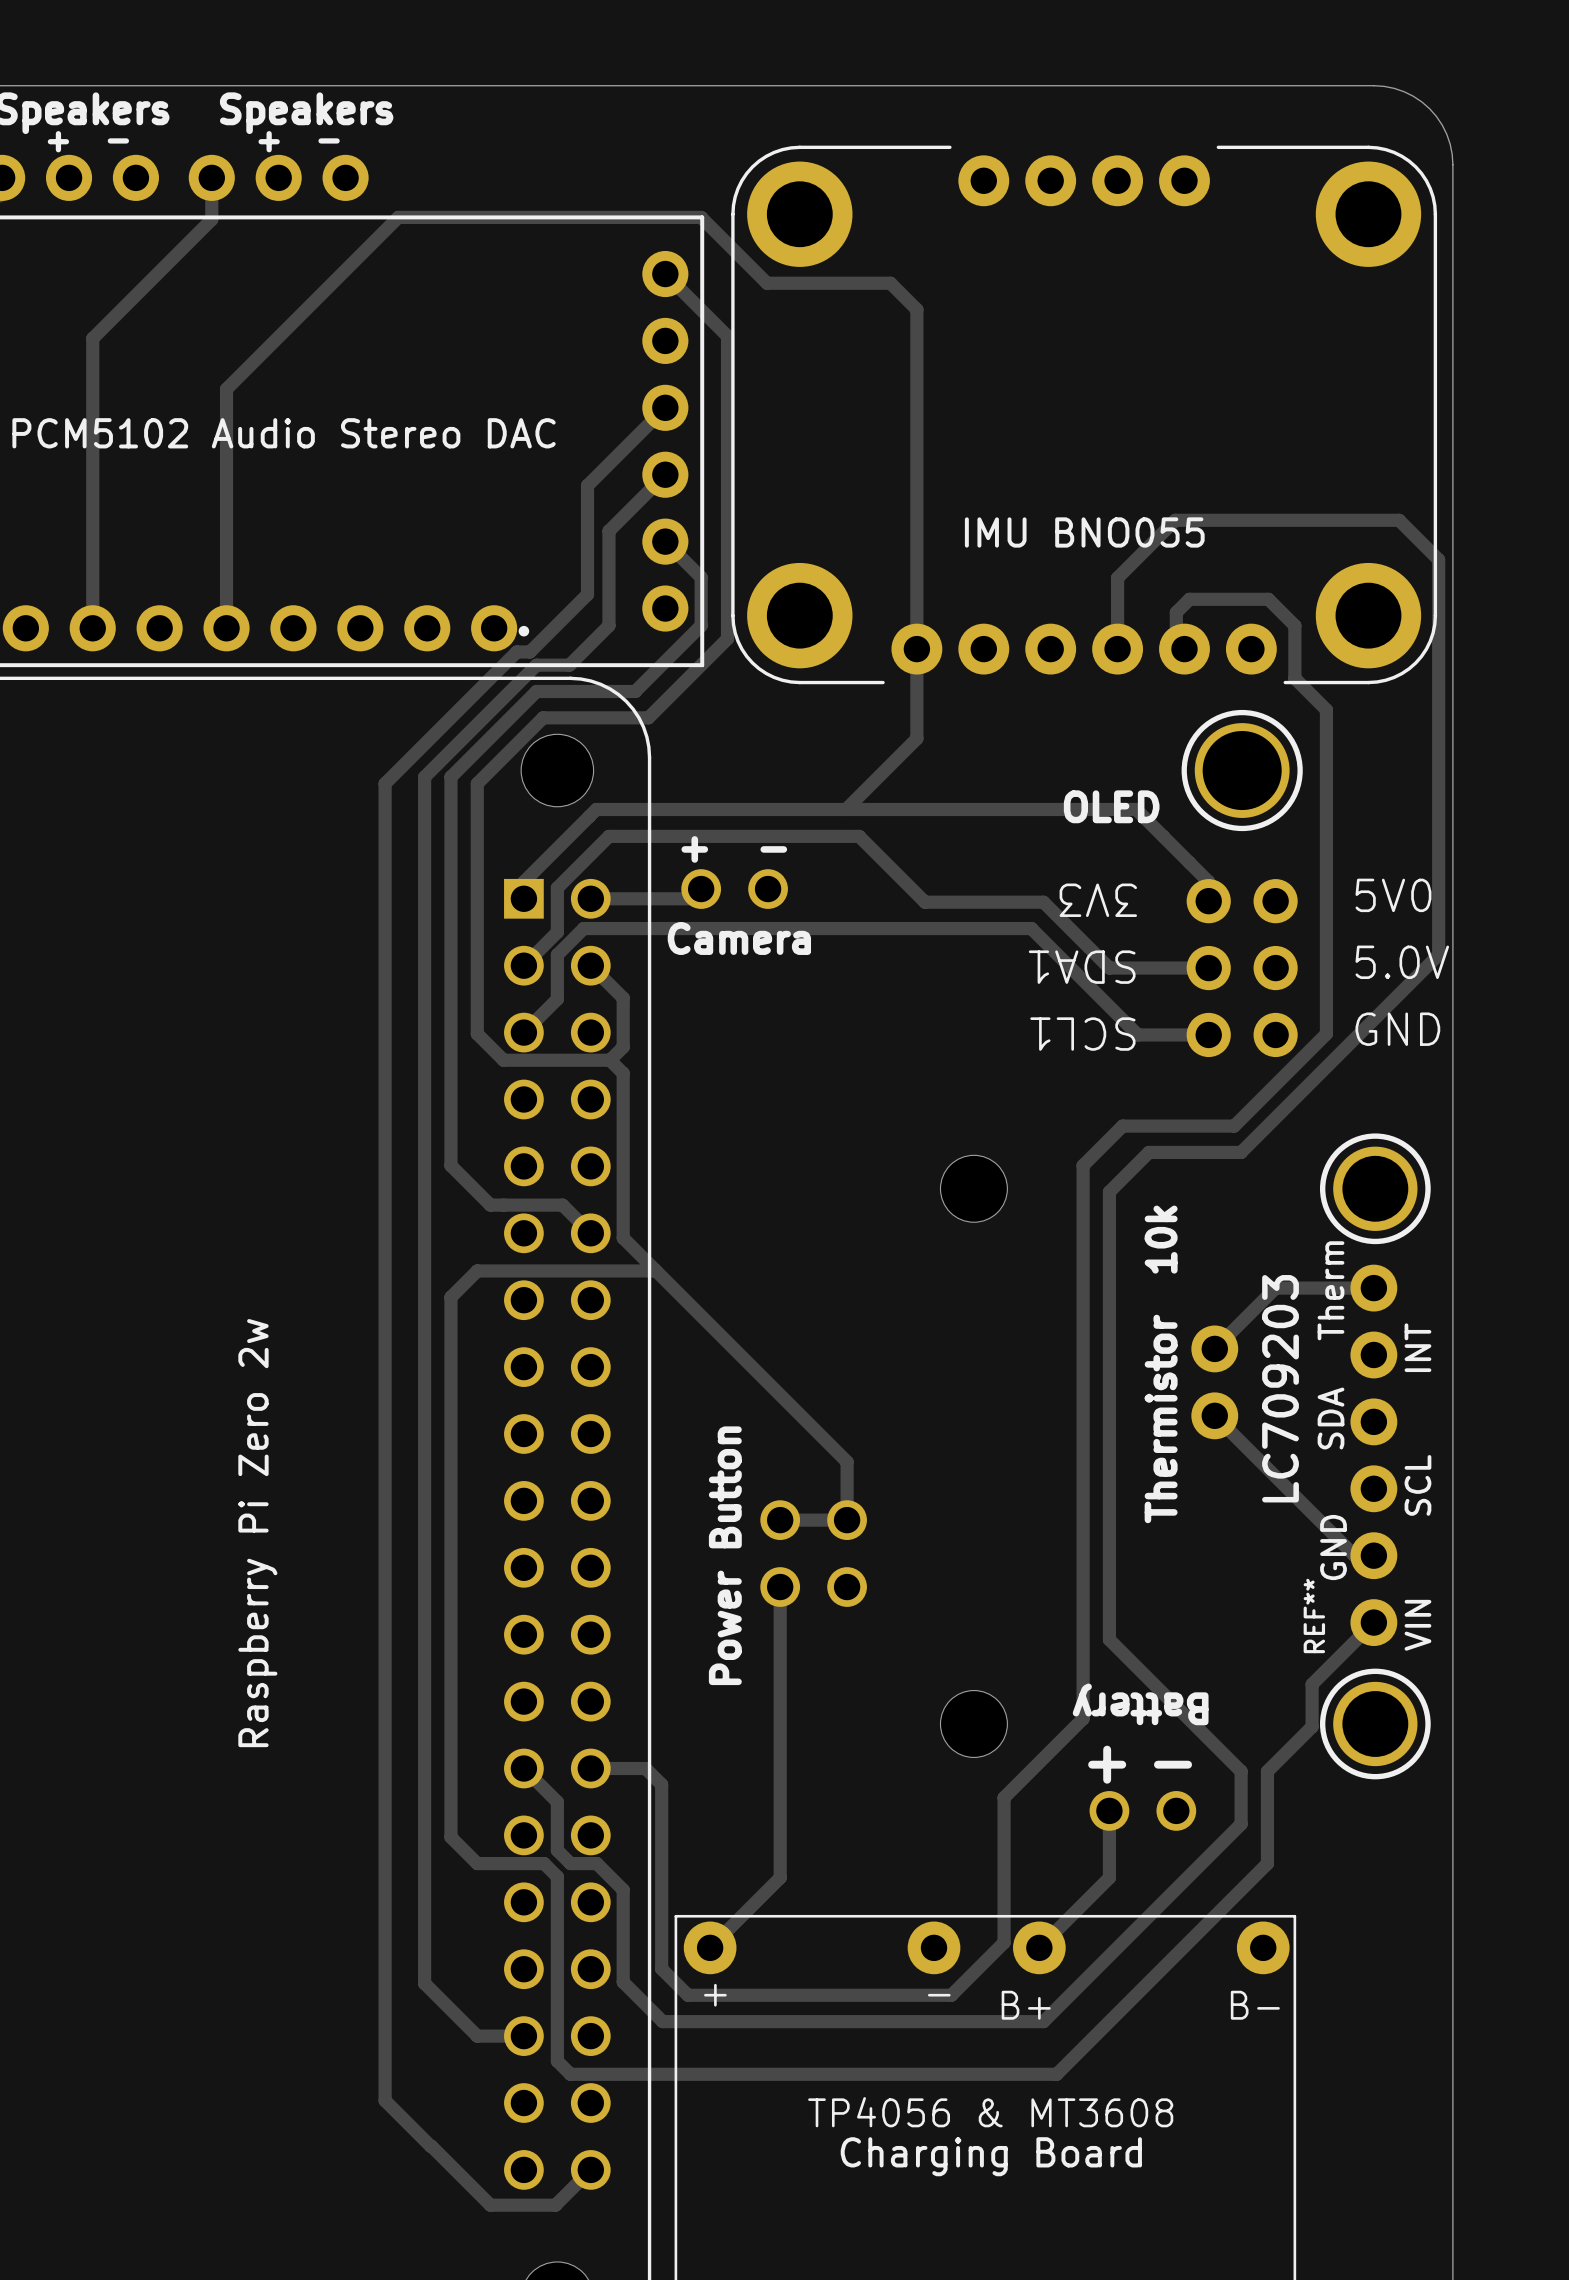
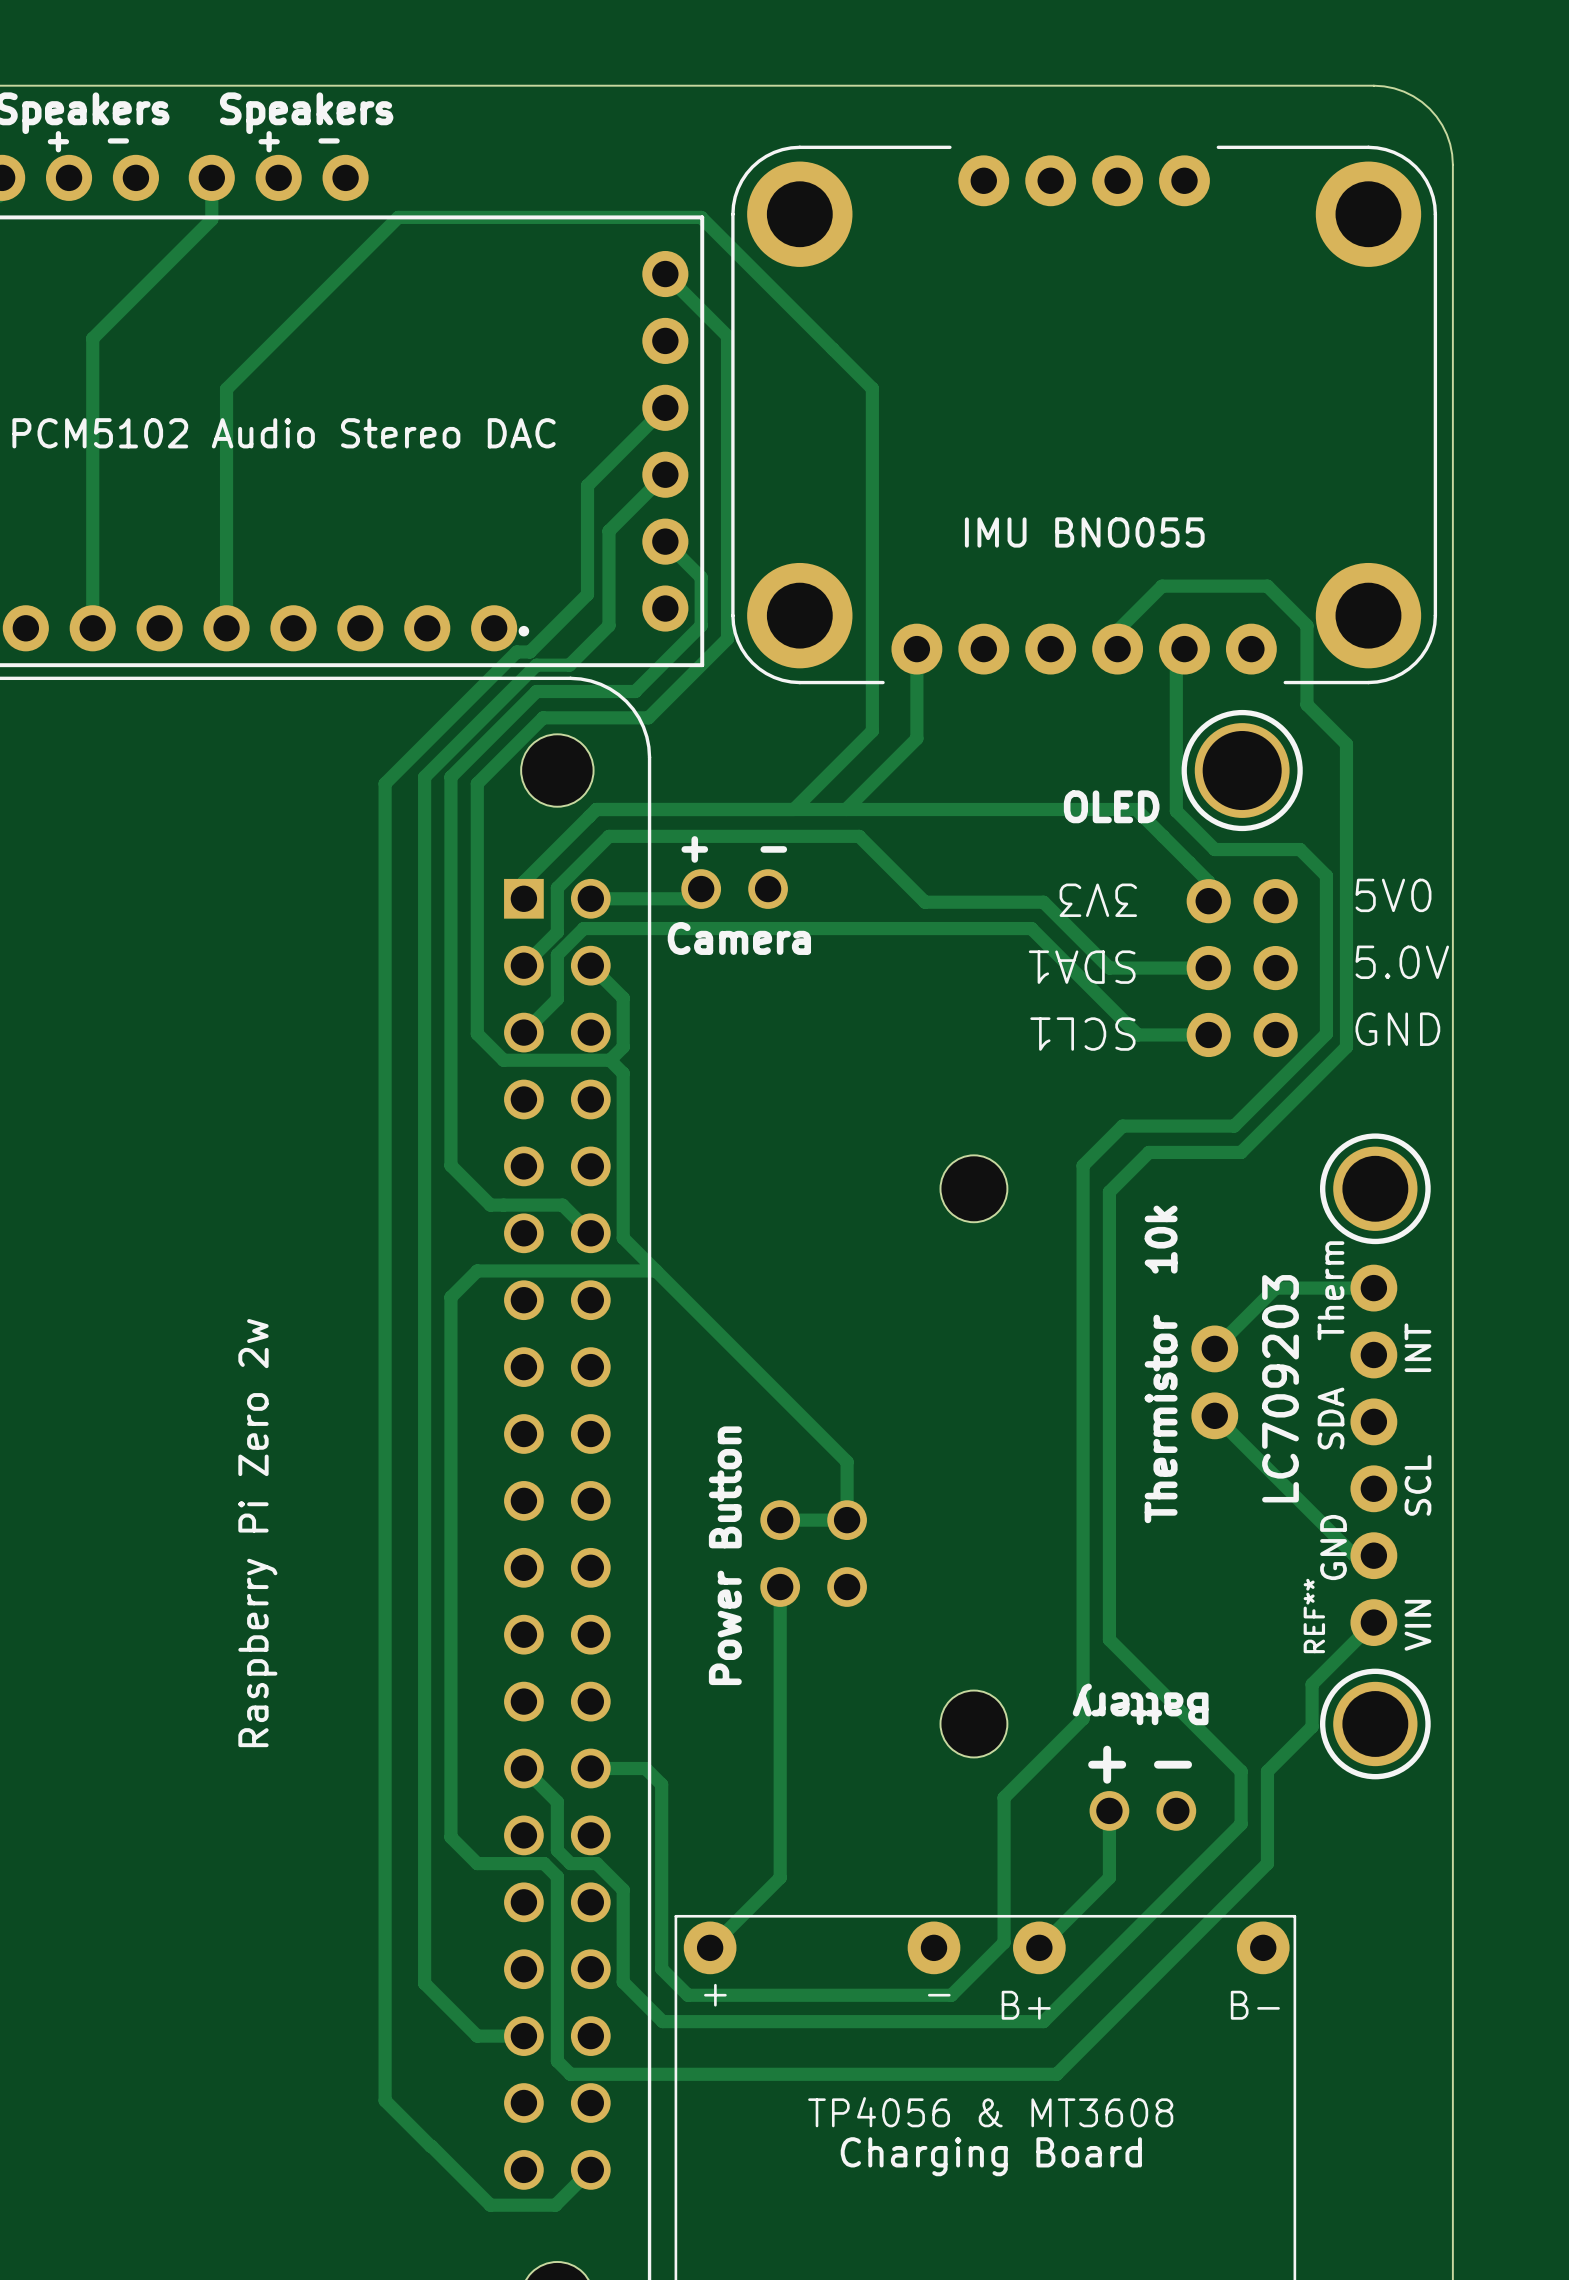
track: (767, 283) (890, 283) (916, 309) (916, 649) -> (767, 283) (872, 388) (872, 731) (793, 809)
track: (1117, 630) (1117, 577) (1175, 520) (1399, 520) (1438, 559) (1438, 954) (1346, 1047) -> (1117, 630) (1162, 586) (1267, 586) (1306, 625) (1306, 704) (1346, 744) (1346, 1047)
track: (1176, 640) (1176, 612) (1189, 599) (1268, 599) (1294, 625) (1294, 678) (1326, 709) (1326, 875) -> (1176, 640) (1176, 811) (1214, 849) (1300, 849) (1326, 875)

